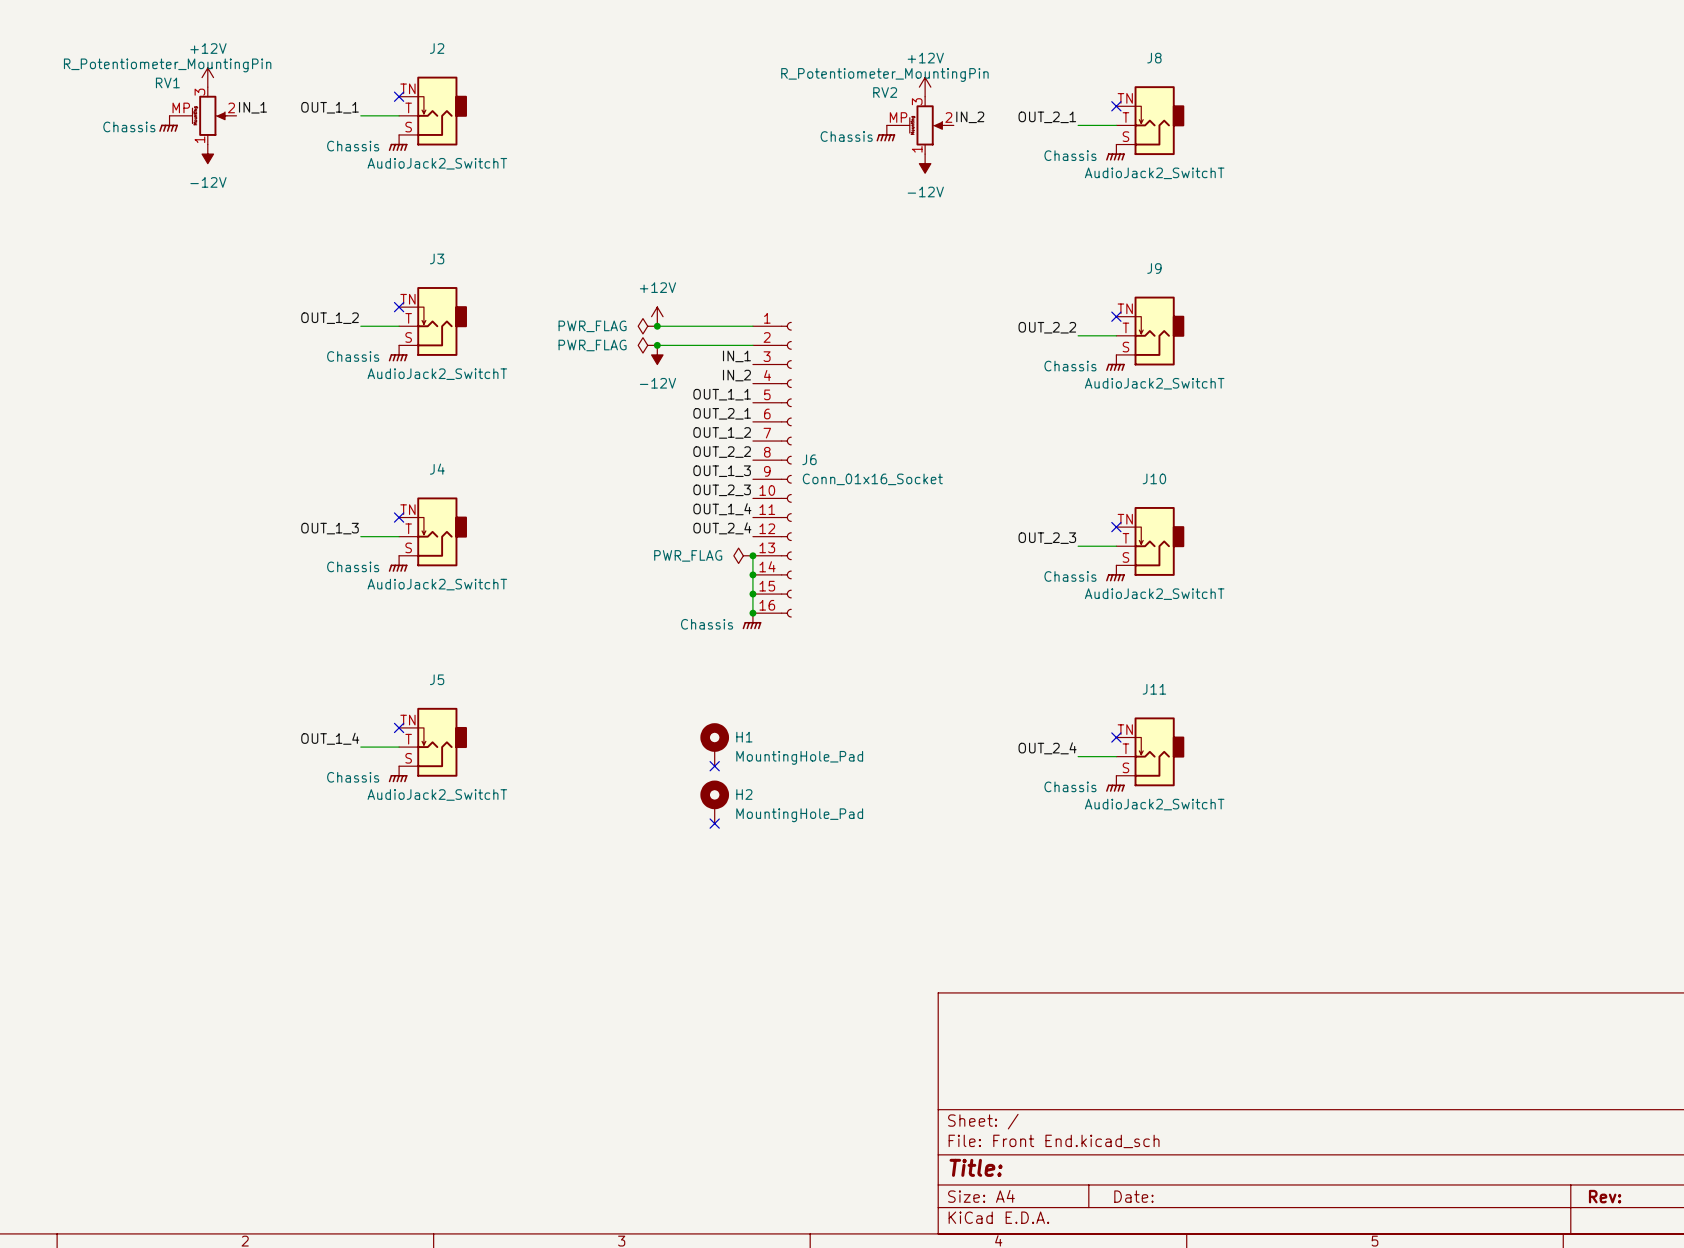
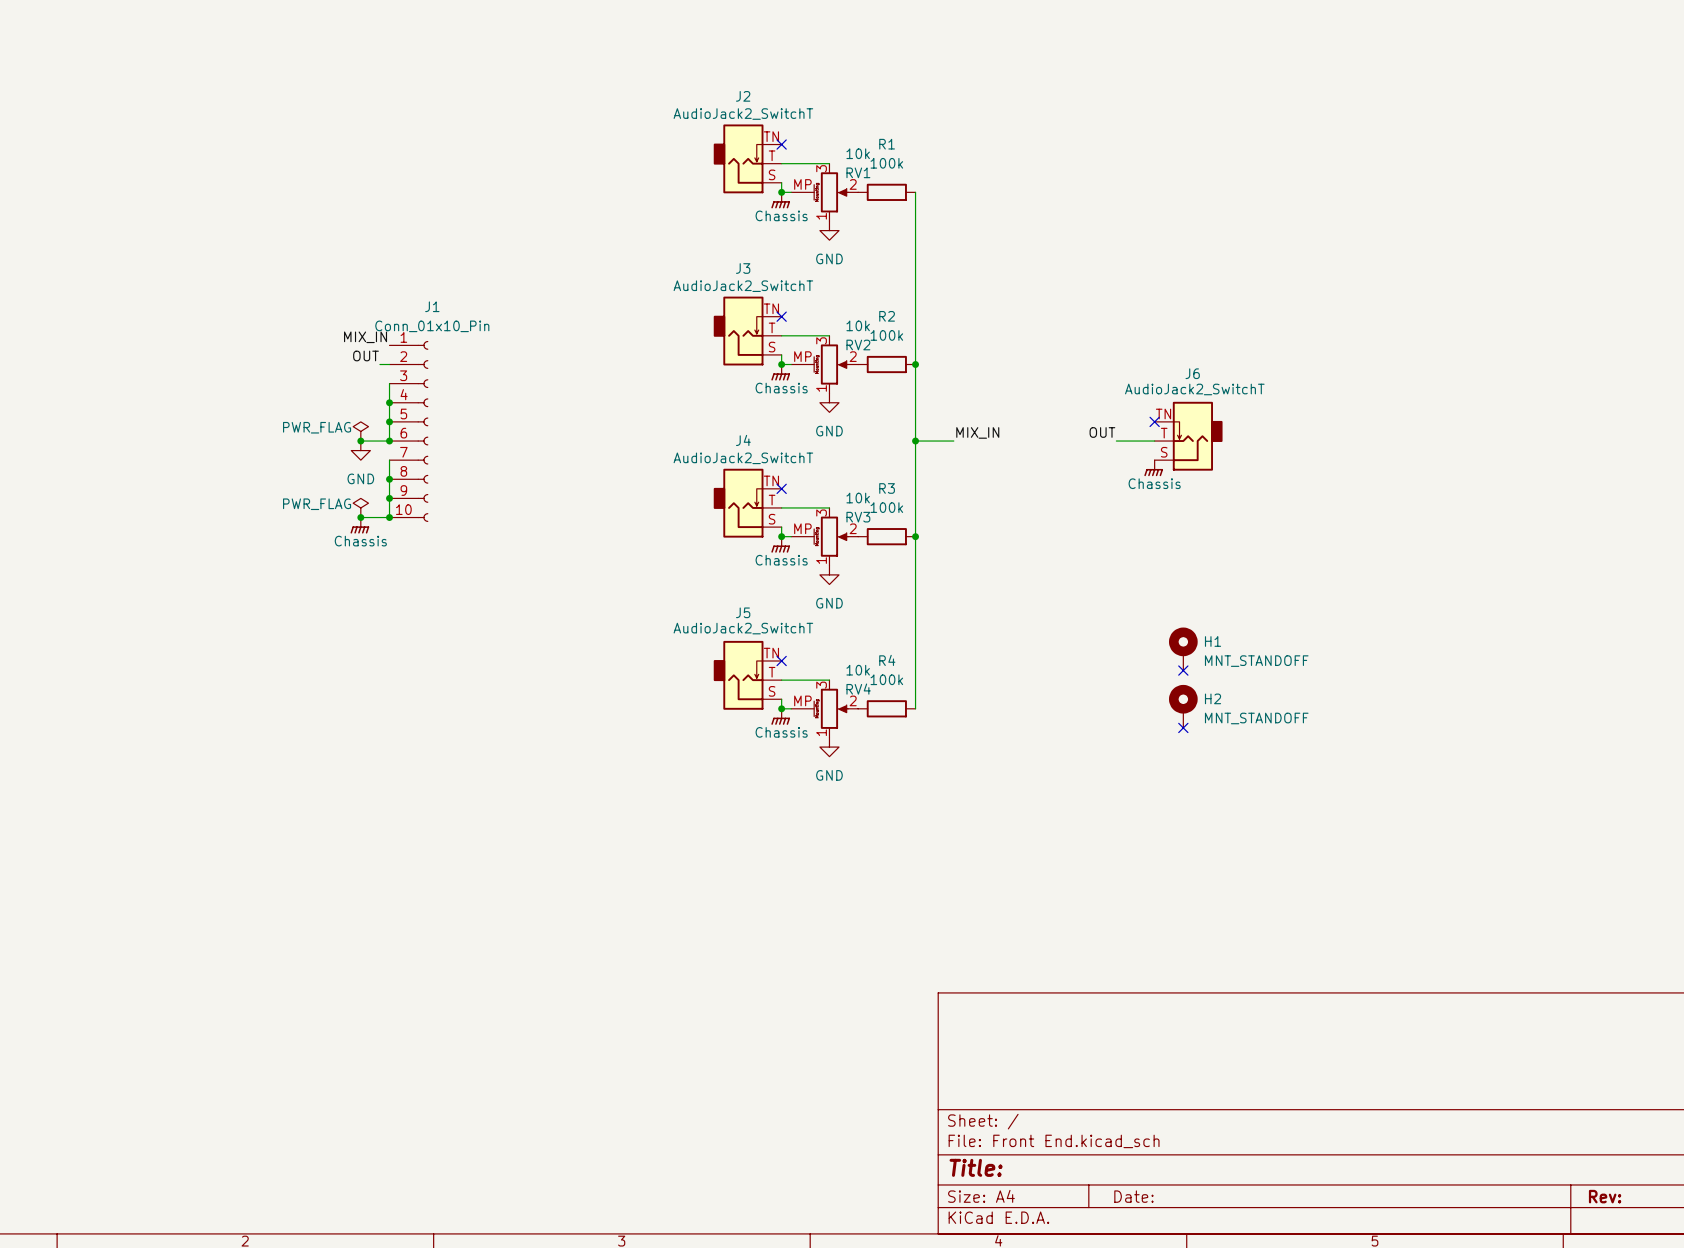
RV1 value: R_Potentiometer_MountingPin (167, 65) -> 10k (858, 153)
RV2 value: R_Potentiometer_MountingPin (884, 74) -> 10k (858, 325)
power symbol: +12V (207, 77) -> none
RV1 name position: RV1 (167, 82) -> RV1 (858, 172)
power symbol: +12V (925, 87) -> none
RV2 name position: RV2 (885, 92) -> RV2 (858, 345)
no-connect mark: (399, 96) -> none
no-connect mark: (1116, 106) -> none
label: IN_1 (252, 107) -> none
label: OUT_1_1 (330, 107) -> none
J2 position: (433, 111) -> (747, 158)
J2 flip: as is (442, 111) -> left-right (738, 158)
RV1 position: (203, 115) -> (824, 192)
wire: (360, 115) (399, 115) -> none
label: IN_2 (970, 117) -> none
label: OUT_2_1 (1047, 117) -> none
J8: AudioJack2_SwitchT (1150, 120) -> none
power symbol: Chassis (168, 123) -> none
RV2 position: (920, 125) -> (824, 364)
wire: (1078, 125) (1116, 125) -> none
power symbol position: Chassis (885, 133) -> Chassis (780, 200)
power symbol text position: Chassis (846, 136) -> Chassis (781, 215)
power symbol: Chassis (398, 143) -> none
no-connect mark: none -> (781, 144)
power symbol: Chassis (1115, 152) -> none
power symbol: -12V (207, 154) -> none
J2 value position: AudioJack2_SwitchT (437, 163) -> AudioJack2_SwitchT (743, 114)
wire: none -> (781, 163) (829, 163)
power symbol: -12V (925, 163) -> none
wire: none -> (781, 182) (781, 192) (791, 192)
junction: none -> (781, 192)
R1: none -> 100k (886, 192)
wire: none -> (915, 192) (915, 708)
power symbol: none -> GND (829, 230)
no-connect mark: (399, 307) -> none
power symbol: +12V (657, 316) -> none
no-connect mark: none -> (781, 316)
no-connect mark: (1116, 316) -> none
label: OUT_1_2 (330, 318) -> none
J3 position: (433, 321) -> (747, 331)
J3 flip: as is (442, 321) -> left-right (738, 331)
J6 symbol: [752, 321, 792, 618] -> [1154, 401, 1223, 471]
wire: (360, 326) (399, 326) -> none
power symbol: PWR_FLAG (647, 326) -> none
wire: (657, 326) (752, 326) -> none
junction: (657, 326) -> none
label: OUT_2_2 (1047, 327) -> none
J9: AudioJack2_SwitchT (1150, 331) -> none
wire: none -> (781, 335) (829, 335)
wire: (1078, 335) (1116, 335) -> (1116, 441) (1154, 441)
label: none -> MIX_IN (365, 337)
power symbol: PWR_FLAG (647, 345) -> none
wire: (657, 345) (752, 345) -> none
junction: (657, 345) -> none
power symbol: Chassis (398, 353) -> none
power symbol: -12V (657, 354) -> none
wire: none -> (781, 354) (781, 364) (791, 364)
label: none -> OUT (365, 355)
label: IN_1 (736, 356) -> none
power symbol: Chassis (1115, 362) -> none
wire: none -> (379, 364) (389, 364)
junction: none -> (781, 364)
R2: none -> 100k (886, 364)
junction: none -> (915, 364)
power symbol: none -> Chassis (780, 372)
J3 value position: AudioJack2_SwitchT (437, 374) -> AudioJack2_SwitchT (743, 286)
label: IN_2 (736, 375) -> none
wire: none -> (389, 383) (389, 441) (360, 441)
label: OUT_1_1 (722, 394) -> none
junction: none -> (389, 402)
power symbol: none -> GND (829, 402)
label: OUT_2_1 (722, 413) -> none
junction: none -> (389, 421)
no-connect mark: none -> (1154, 421)
power symbol: none -> PWR_FLAG (360, 431)
J1: none -> Conn_01x10_Pin (408, 431)
label: OUT_1_2 (722, 432) -> none
label: none -> MIX_IN (977, 432)
label: none -> OUT (1102, 432)
junction: none -> (360, 441)
junction: none -> (389, 441)
wire: none -> (915, 441) (953, 441)
junction: none -> (915, 441)
power symbol: none -> GND (360, 450)
label: OUT_2_2 (722, 452) -> none
J6 name position: J6 (809, 459) -> J6 (1192, 373)
wire: none -> (389, 460) (389, 517) (360, 517)
power symbol: none -> Chassis (1153, 468)
label: OUT_1_3 (722, 471) -> none
junction: none -> (389, 479)
J6 value: Conn_01x16_Socket (872, 479) -> AudioJack2_SwitchT (1194, 389)
no-connect mark: none -> (781, 488)
label: OUT_2_3 (722, 490) -> none
junction: none -> (389, 498)
power symbol: none -> PWR_FLAG (360, 507)
wire: none -> (781, 507) (829, 507)
label: OUT_1_4 (722, 509) -> none
junction: none -> (360, 517)
junction: none -> (389, 517)
no-connect mark: (399, 517) -> none
wire: none -> (781, 527) (781, 536) (791, 536)
no-connect mark: (1116, 527) -> none
label: OUT_1_3 (330, 528) -> none
label: OUT_2_4 (722, 528) -> none
J4 position: (433, 531) -> (747, 503)
J4 flip: as is (442, 531) -> left-right (738, 503)
wire: (360, 536) (399, 536) -> none
junction: none -> (781, 536)
RV3: none -> 10k (824, 536)
R3: none -> 100k (886, 536)
junction: none -> (915, 536)
label: OUT_2_3 (1047, 538) -> none
J10: AudioJack2_SwitchT (1150, 541) -> none
power symbol: none -> Chassis (780, 544)
wire: (1078, 546) (1116, 546) -> none
power symbol: PWR_FLAG (743, 555) -> none
wire: (752, 555) (752, 613) -> none
junction: (752, 555) -> none
power symbol position: Chassis (398, 563) -> Chassis (359, 525)
power symbol text position: Chassis (353, 566) -> Chassis (360, 541)
power symbol: Chassis (1115, 573) -> none
junction: (752, 574) -> none
power symbol: none -> GND (829, 574)
J4 value position: AudioJack2_SwitchT (437, 584) -> AudioJack2_SwitchT (743, 458)
junction: (752, 594) -> none
junction: (752, 613) -> none
power symbol: Chassis (751, 621) -> none
no-connect mark: none -> (781, 660)
no-connect mark: none -> (1183, 670)
wire: none -> (781, 680) (829, 680)
wire: none -> (781, 699) (781, 708) (791, 708)
junction: none -> (781, 708)
RV4: none -> 10k (824, 708)
R4: none -> 100k (886, 708)
power symbol: none -> Chassis (780, 716)
no-connect mark: (399, 727) -> none
no-connect mark: none -> (1183, 727)
no-connect mark: (1116, 737) -> none
label: OUT_1_4 (330, 738) -> none
J5 position: (433, 742) -> (747, 675)
J5 flip: as is (442, 742) -> left-right (738, 675)
H1 position: (714, 744) -> (1183, 649)
wire: (360, 747) (399, 747) -> none
power symbol: none -> GND (829, 747)
label: OUT_2_4 (1047, 748) -> none
J11: AudioJack2_SwitchT (1150, 751) -> none
wire: (1078, 756) (1116, 756) -> none
H1 value: MountingHole_Pad (799, 757) -> MNT_STANDOFF (1256, 661)
no-connect mark: (714, 766) -> none
power symbol: Chassis (398, 774) -> none
power symbol: Chassis (1115, 783) -> none
J5 value position: AudioJack2_SwitchT (437, 794) -> AudioJack2_SwitchT (743, 628)
H2 position: (714, 802) -> (1183, 706)
H2 value: MountingHole_Pad (799, 815) -> MNT_STANDOFF (1256, 718)
no-connect mark: (714, 823) -> none

